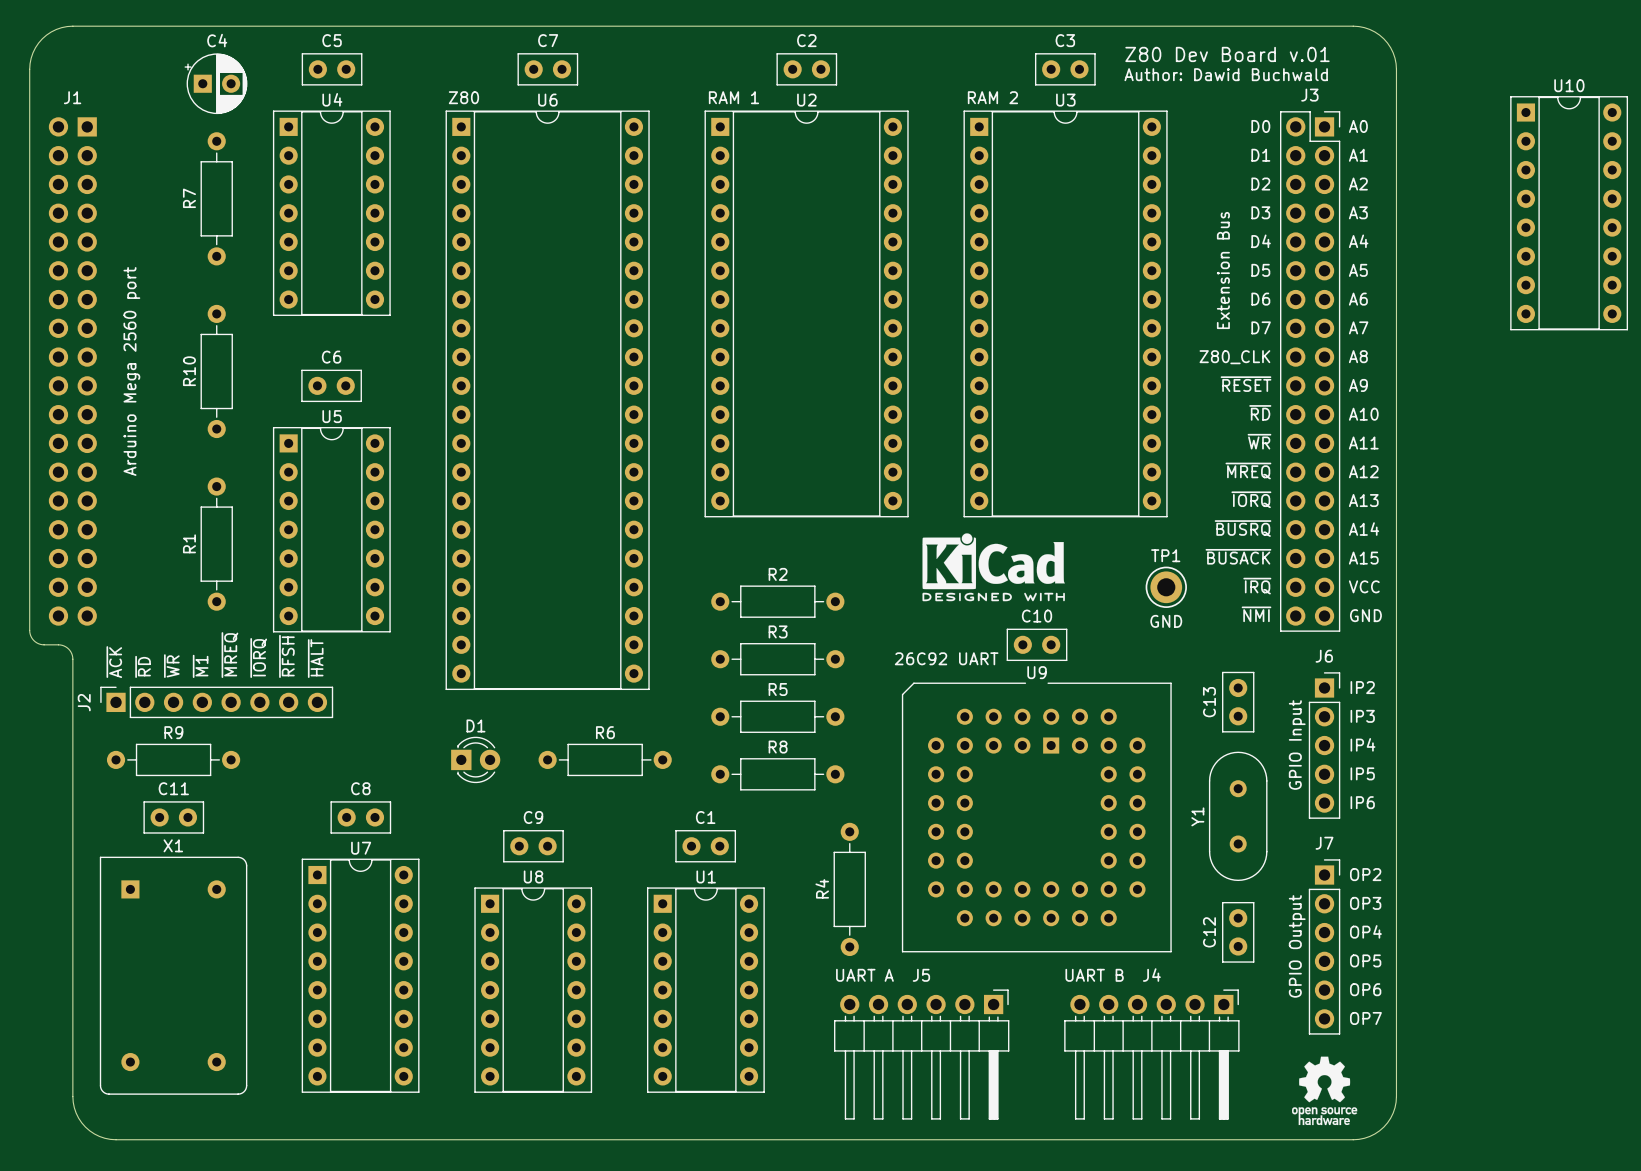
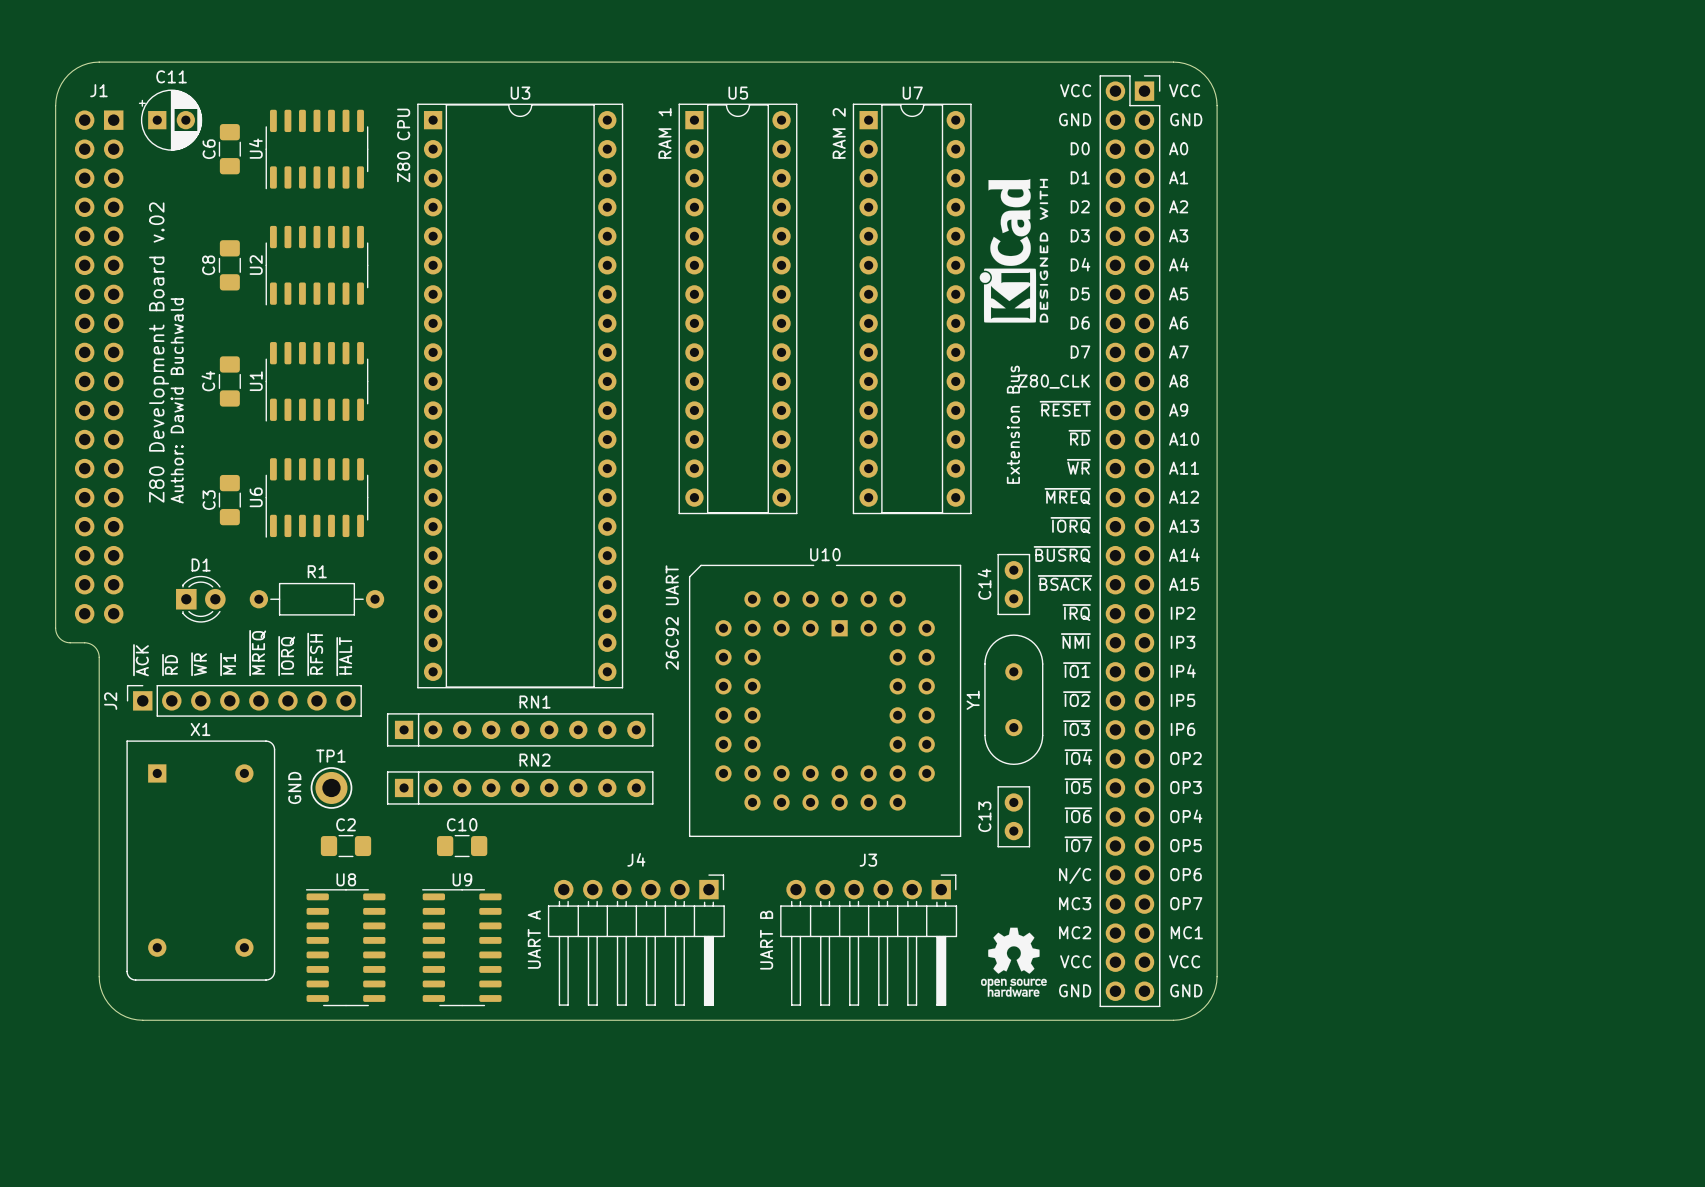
C4 name position: C4 (217, 40) -> C4 (208, 381)
C3 name position: C3 (1065, 40) -> C3 (209, 500)
C4 footprint: [184, 53, 248, 115] -> [218, 356, 241, 407]
C2 footprint: [776, 53, 838, 86] -> [320, 834, 372, 858]
C3 footprint: [1034, 53, 1096, 86] -> [218, 474, 241, 526]
text: Z80 Dev Board v.01 (1227, 54) -> none
C5: (332, 69) -> none
C7: (547, 69) -> none
text: Author: Dawid Buchwald (1226, 74) -> none
J3 name position: J3 (1309, 95) -> J3 (868, 860)
U10 footprint: [1510, 96, 1629, 331] -> [688, 564, 962, 838]
text: Z80 (463, 97) -> none
text rotation: 0° (733, 97) -> 90° counterclockwise (664, 133)
text position: RAM 1 (733, 97) -> RAM 1 (664, 133)
text rotation: 0° (992, 97) -> 90° counterclockwise (839, 133)
text position: RAM 2 (992, 97) -> RAM 2 (839, 133)
text: none -> VCC (1075, 90)
text: none -> VCC (1184, 90)
U4 name position: U4 (332, 99) -> U4 (255, 148)
U6 name position: U6 (547, 100) -> U6 (256, 497)
U2 name position: U2 (806, 100) -> U2 (256, 265)
U3 name position: U3 (1065, 100) -> U3 (520, 93)
U4 footprint: [272, 110, 391, 316] -> [265, 109, 369, 190]
U6 footprint: [445, 110, 650, 691] -> [265, 458, 369, 538]
U2 footprint: [704, 110, 909, 518] -> [265, 225, 369, 306]
U3 footprint: [963, 110, 1168, 518] -> [417, 103, 624, 689]
J3 footprint: [1280, 111, 1341, 632] -> [780, 874, 958, 1006]
board edge: (29, 112) (30, 63) (35, 47) (51, 31) (72, 26) (1353, 26) (1369, 29) (1383, 38) (1393, 52) (1396, 69) (1396, 1096) (1390, 1118) (1379, 1130) (1364, 1138) (1353, 1139) (110, 1139) (94, 1133) (85, 1127) (74, 1107) (72, 975) -> (55, 105) (58, 88) (68, 74) (82, 65) (99, 62) (1173, 62) (1190, 65) (1204, 74) (1213, 88) (1217, 105) (1217, 976) (1211, 998) (1200, 1011) (1184, 1018) (1173, 1020) (142, 1020) (126, 1016) (111, 1007) (102, 993) (99, 976)
text: none -> GND (1075, 119)
text: none -> GND (1186, 119)
text position: D0 (1260, 126) -> D0 (1080, 148)
text position: A0 (1358, 126) -> A0 (1178, 148)
text: none -> Z80 CPU (403, 145)
text position: D1 (1260, 155) -> D1 (1080, 177)
text position: A1 (1358, 155) -> A1 (1178, 177)
text position: D2 (1260, 184) -> D2 (1080, 206)
text position: A2 (1358, 184) -> A2 (1178, 206)
drawing: none -> [979, 178, 1049, 323]
R7: (216, 198) -> none
text position: D3 (1260, 212) -> D3 (1080, 235)
text position: A3 (1358, 212) -> A3 (1178, 235)
text position: D4 (1261, 241) -> D4 (1080, 264)
text position: A4 (1358, 241) -> A4 (1178, 264)
text: Extension Bus (1223, 270) -> none
text position: D5 (1260, 270) -> D5 (1080, 293)
text position: A5 (1358, 270) -> A5 (1178, 293)
text position: D6 (1260, 299) -> D6 (1080, 322)
text position: A6 (1358, 299) -> A6 (1178, 322)
text position: D7 (1261, 327) -> D7 (1080, 352)
text position: A7 (1358, 327) -> A7 (1178, 352)
text position: A8 (1358, 356) -> A8 (1178, 381)
text: none -> Z80 Development Board v.02 (159, 352)
C6 name position: C6 (331, 357) -> C6 (209, 149)
text position: Z80_CLK (1234, 357) -> Z80_CLK (1054, 381)
C6 footprint: [301, 369, 362, 403] -> [218, 124, 241, 175]
text: Arduino Mega 2560 port (131, 371) -> none
R10: (216, 371) -> none
text position: ~{RESET} (1246, 384) -> ~{RESET} (1065, 408)
text position: A9 (1358, 385) -> A9 (1178, 410)
text: none -> Author: Dawid Buchwald (177, 400)
text position: ~{RD} (1260, 412) -> ~{RD} (1079, 437)
text position: A10 (1363, 414) -> A10 (1184, 439)
U5 name position: U5 (332, 416) -> U5 (738, 93)
U5 footprint: [272, 426, 391, 633] -> [678, 103, 798, 515]
text: none -> Extension Bus (1013, 424)
text position: ~{WR} (1259, 441) -> ~{WR} (1078, 466)
text position: A11 (1363, 442) -> A11 (1184, 468)
text position: ~{MREQ} (1248, 471) -> ~{MREQ} (1067, 496)
text position: A12 (1363, 471) -> A12 (1184, 497)
text position: ~{IORQ} (1251, 499) -> ~{IORQ} (1070, 525)
text position: A13 (1363, 500) -> A13 (1184, 526)
text position: ~{BUSRQ} (1243, 528) -> ~{BUSRQ} (1062, 554)
text position: A14 (1364, 529) -> A14 (1184, 554)
drawing: [922, 533, 1065, 602] -> none
R1 rotation: 0° (216, 544) -> 90° clockwise (316, 599)
R1 position: (216, 544) -> (316, 599)
part: none -> (1129, 541)
text: ~{BUSACK} (1238, 556) -> none
text position: A15 (1363, 558) -> A15 (1184, 584)
text: none -> ~{BSACK} (1065, 582)
text position: ~{IRQ} (1257, 586) -> ~{IRQ} (1076, 612)
text: VCC (1364, 586) -> none
C14: none -> (1013, 584)
TP1 position: (1166, 587) -> (331, 787)
R2: (777, 601) -> none
text position: ~{NMI} (1256, 614) -> ~{NMI} (1075, 641)
text: GND (1365, 615) -> none
text: GND (1166, 621) -> none
C10 footprint: [1006, 628, 1068, 662] -> [437, 834, 488, 858]
text rotation: 0° (946, 658) -> 90° counterclockwise (672, 617)
text position: 26C92 UART (946, 658) -> 26C92 UART (672, 617)
R3: (777, 659) -> none
text: none -> ~{IO1} (1076, 670)
U9 name position: U9 (1037, 672) -> U9 (462, 879)
U9 footprint: [901, 682, 1172, 953] -> [422, 889, 502, 1007]
text position: IP2 (1362, 687) -> IP2 (1182, 613)
text: none -> ~{IO2} (1076, 699)
C13 position: (1238, 702) -> (1013, 816)
R5: (777, 716) -> none
text position: IP3 (1362, 716) -> IP3 (1182, 642)
text: none -> ~{IO3} (1076, 728)
RN1: none -> (520, 729)
text position: IP4 (1362, 744) -> IP4 (1183, 671)
text: GPIO Input (1297, 745) -> none
J6: (1324, 745) -> none
text: none -> ~{IO4} (1078, 757)
R9: (173, 759) -> none
D1 position: (475, 759) -> (200, 599)
R6: (605, 759) -> none
text position: IP5 (1362, 773) -> IP5 (1182, 700)
R8: (777, 774) -> none
text: none -> ~{IO5} (1078, 786)
text: none -> GND (294, 787)
C8 name position: C8 (360, 788) -> C8 (208, 265)
RN2: none -> (520, 787)
C11 footprint: [143, 801, 205, 834] -> [138, 89, 203, 151]
C8 footprint: [330, 801, 392, 834] -> [218, 240, 241, 291]
text position: IP6 (1362, 802) -> IP6 (1182, 729)
text: none -> ~{IO6} (1078, 815)
Y1 position: (1238, 816) -> (1013, 699)
text: none -> ~{IO7} (1078, 844)
C9: (533, 846) -> none
C1: (705, 846) -> none
U7 name position: U7 (361, 848) -> U7 (912, 93)
U7 footprint: [301, 858, 420, 1093] -> [852, 103, 972, 515]
text position: OP2 (1365, 874) -> OP2 (1185, 758)
text: none -> N/C (1075, 875)
U8 name position: U8 (533, 876) -> U8 (346, 879)
U1 name position: U1 (706, 876) -> U1 (256, 381)
U8 footprint: [474, 887, 593, 1093] -> [305, 889, 386, 1007]
U1 footprint: [646, 887, 765, 1093] -> [265, 342, 369, 422]
R4: (849, 889) -> none
text: none -> MC3 (1075, 903)
text position: OP3 (1365, 903) -> OP3 (1185, 787)
drawing: none -> [981, 927, 1047, 997]
text position: OP4 (1365, 931) -> OP4 (1186, 816)
text: none -> MC2 (1075, 932)
text: none -> MC1 (1186, 932)
C12: (1238, 932) -> none
text: none -> UART A (534, 939)
text: none -> UART B (766, 940)
text: GPIO Output (1297, 946) -> none
J7: (1324, 946) -> none
text: none -> VCC (1075, 961)
text: none -> VCC (1184, 961)
text position: OP5 (1365, 960) -> OP5 (1185, 845)
X1 position: (173, 975) -> (200, 860)
text: UART A (864, 975) -> none
text: UART B (1094, 975) -> none
text: none -> GND (1075, 990)
text: none -> GND (1186, 990)
text position: OP6 (1365, 989) -> OP6 (1185, 874)
text position: OP7 (1365, 1018) -> OP7 (1186, 903)
J5: (921, 1054) -> none
J4 position: (1151, 1054) -> (636, 940)
drawing: [1292, 1056, 1358, 1126] -> none

